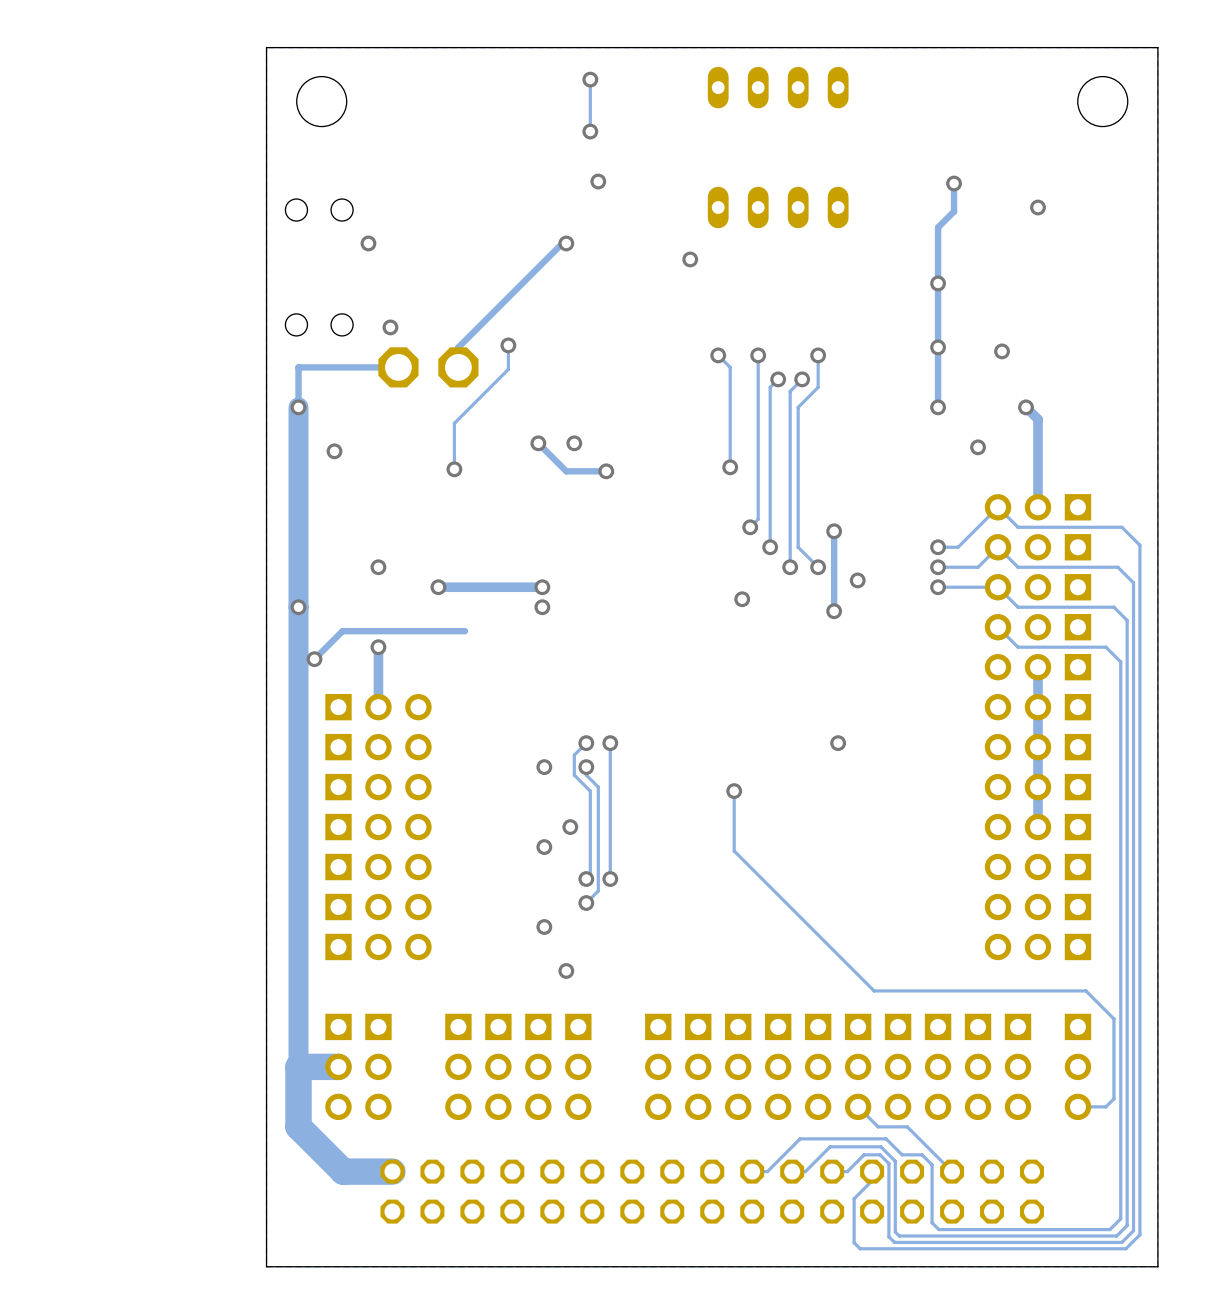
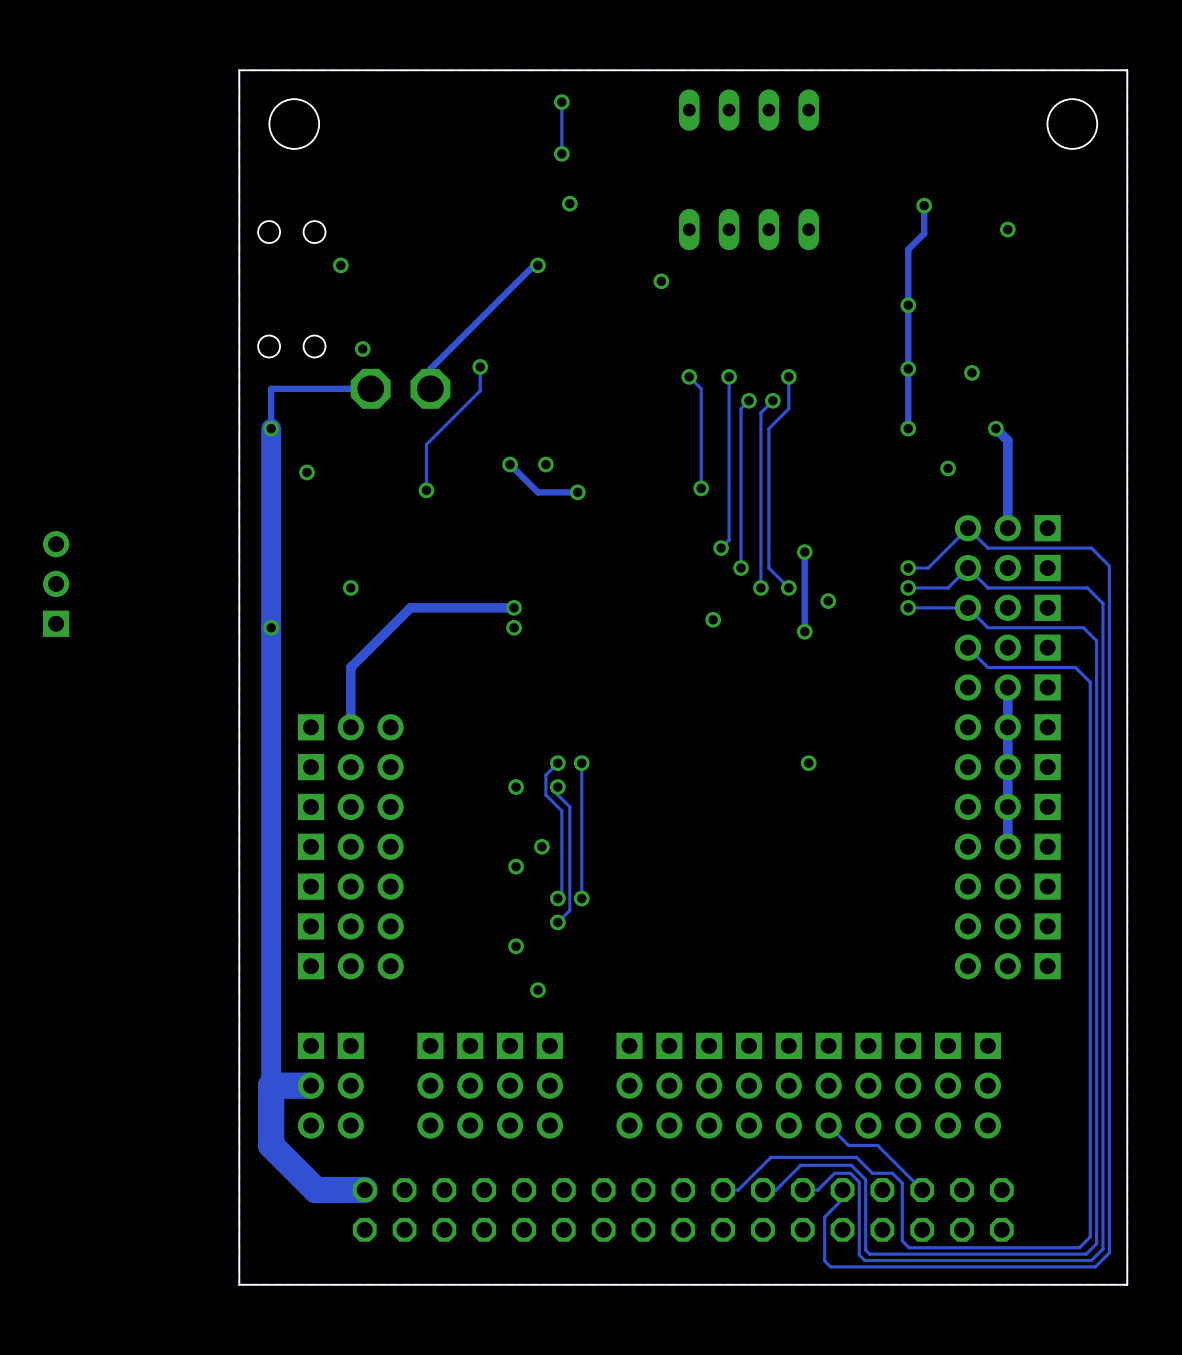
part: none -> (56, 583)
track: none -> (410, 607) (350, 667)
via: (438, 587) -> none
track: (465, 631) (342, 631) (314, 659) -> none
via: (378, 647) -> none
via: (314, 659) -> none
track: (734, 791) (734, 851) (874, 990) (1085, 990) (1113, 1018) (1113, 1098) (1105, 1106) (1077, 1106) -> none
via: (734, 791) -> none
part: (1077, 1066) -> none

